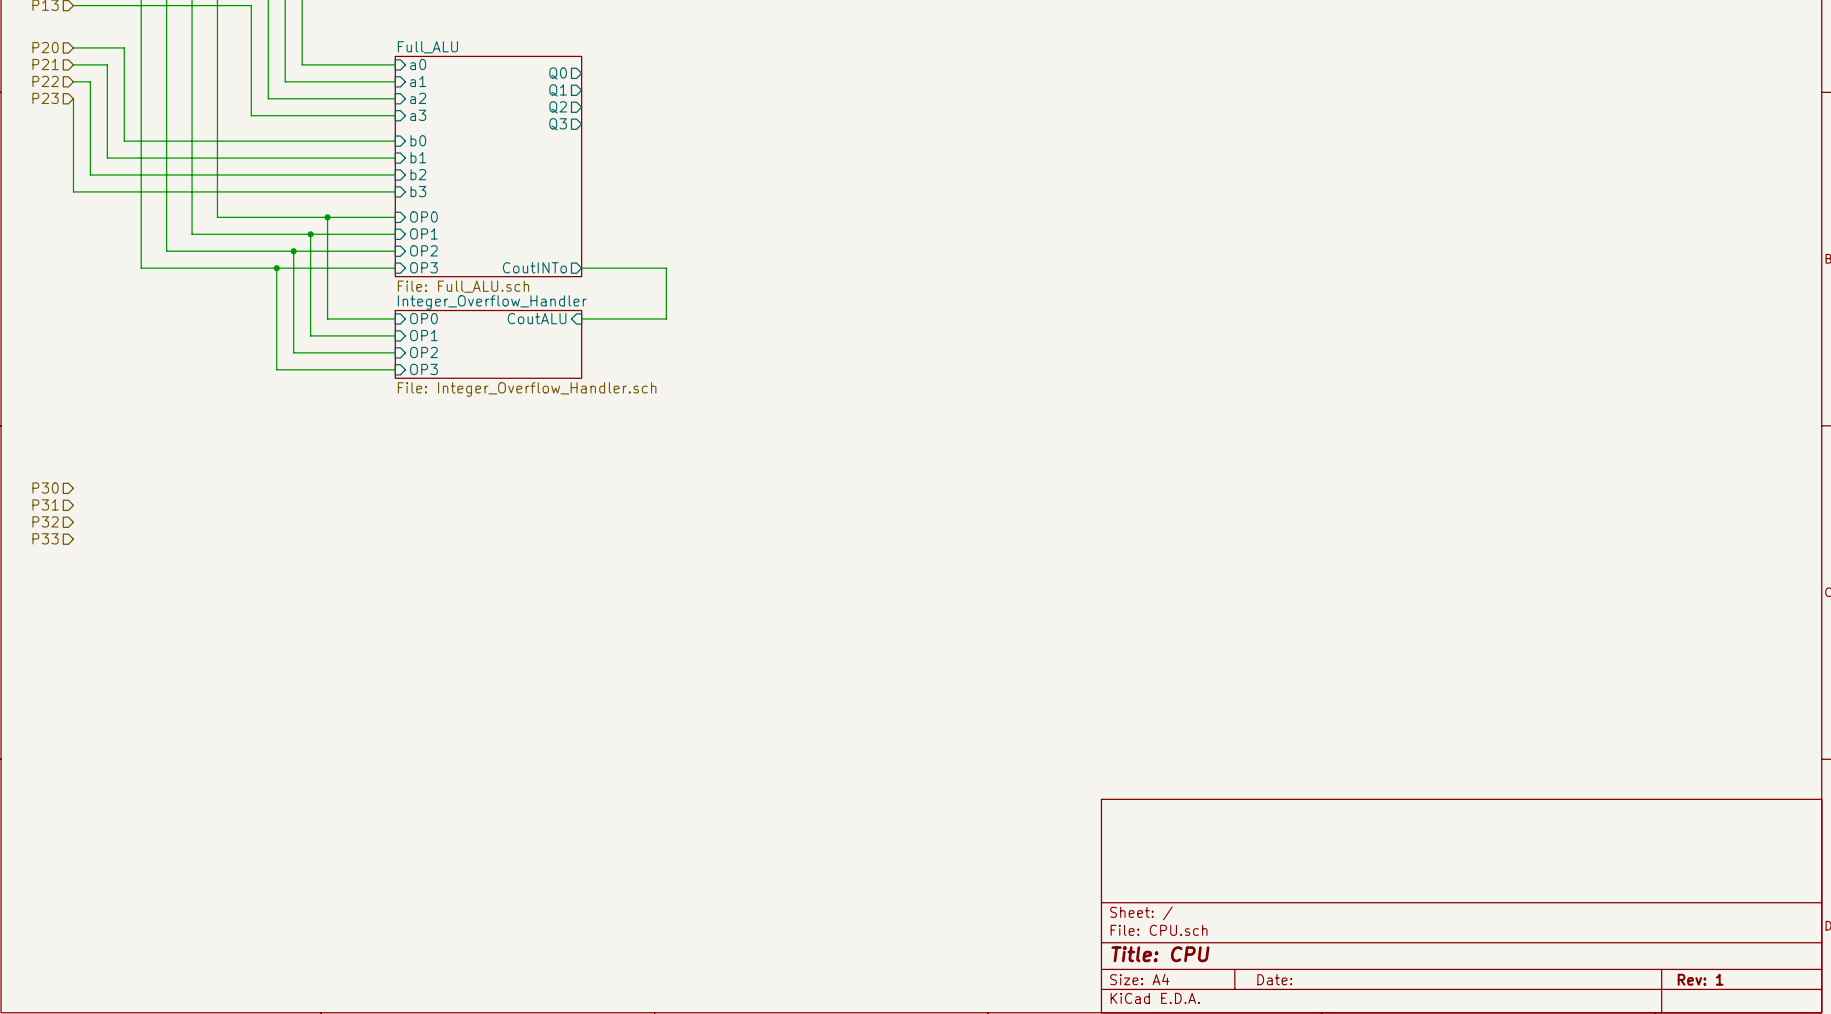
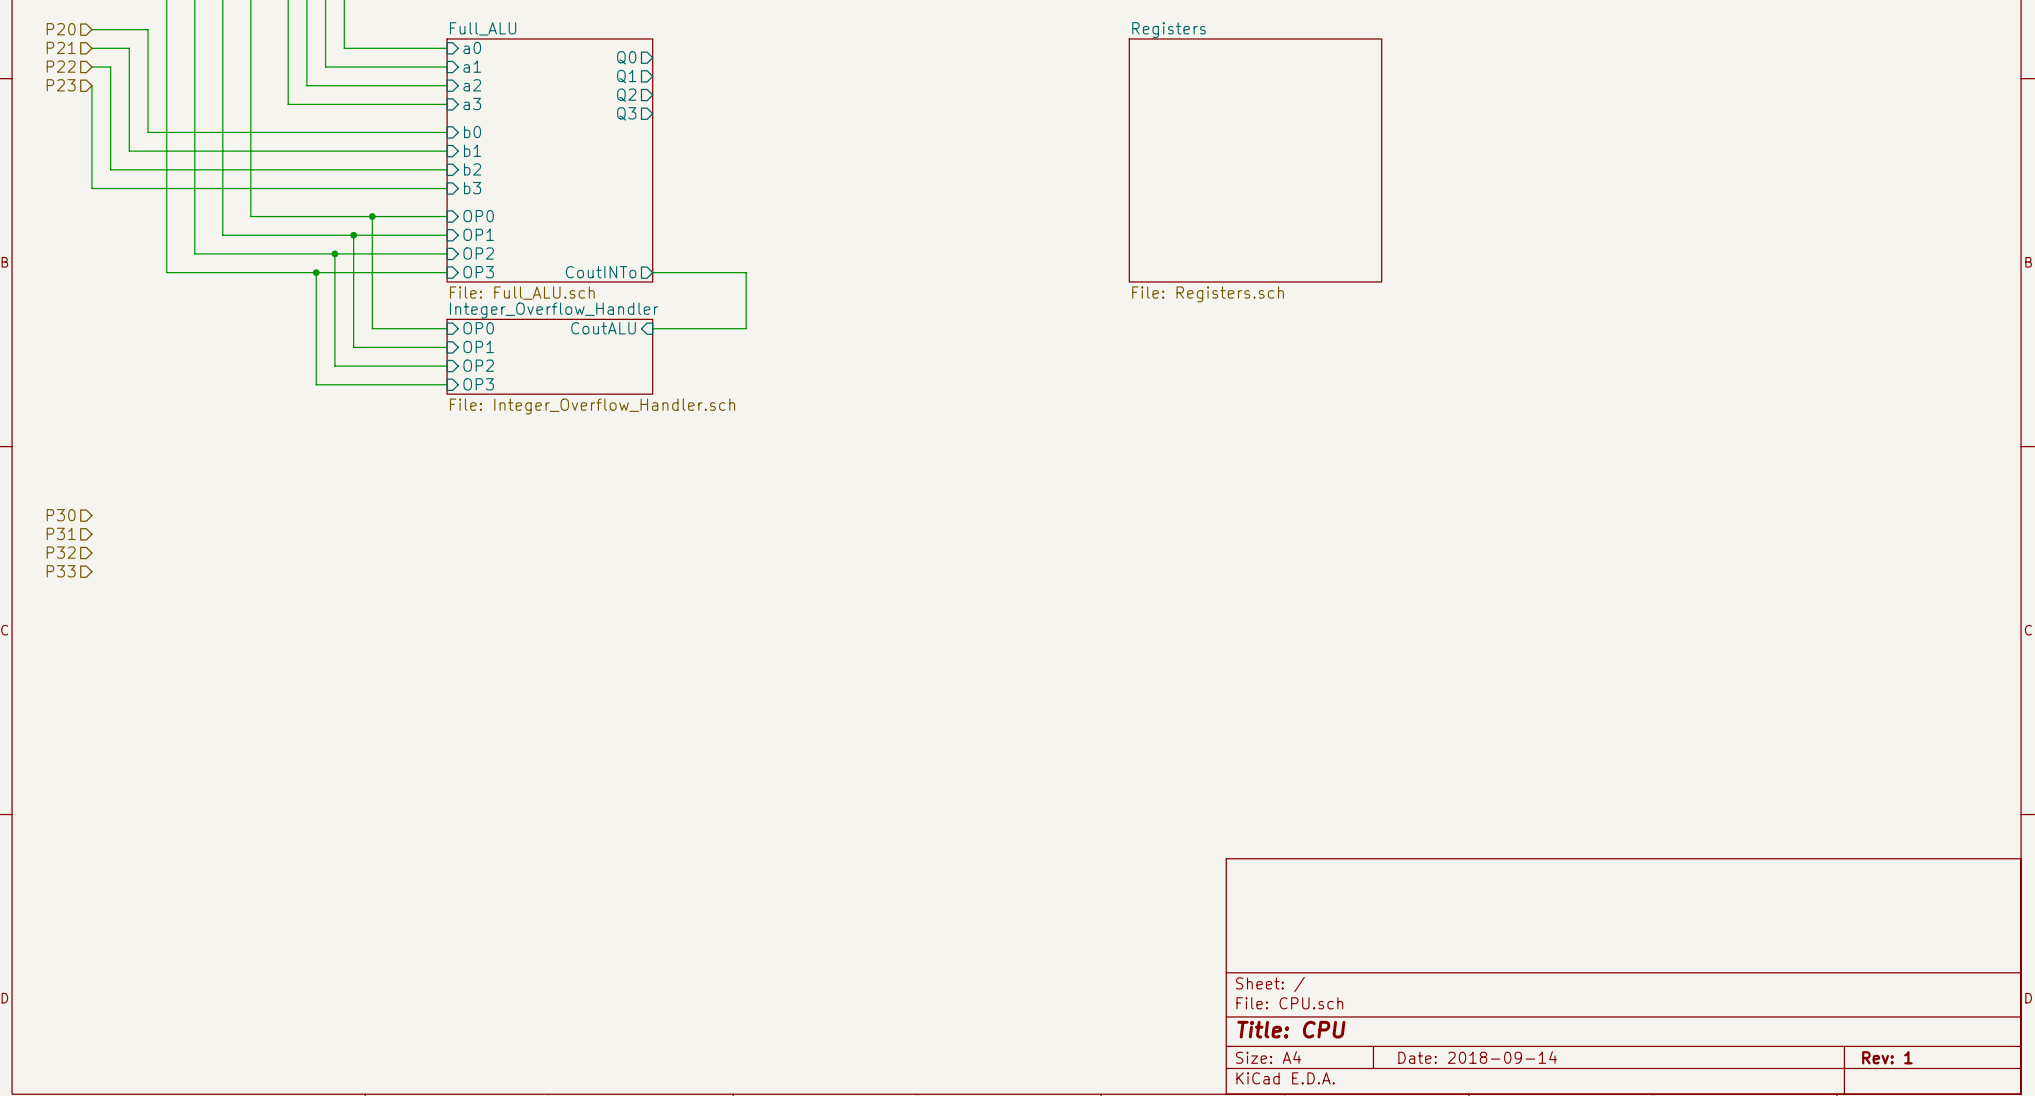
sheet Registers: none -> File: Registers.sch (1255, 160)
title block: Date: (1274, 979) -> Date: 2018-09-14 (1477, 1057)

